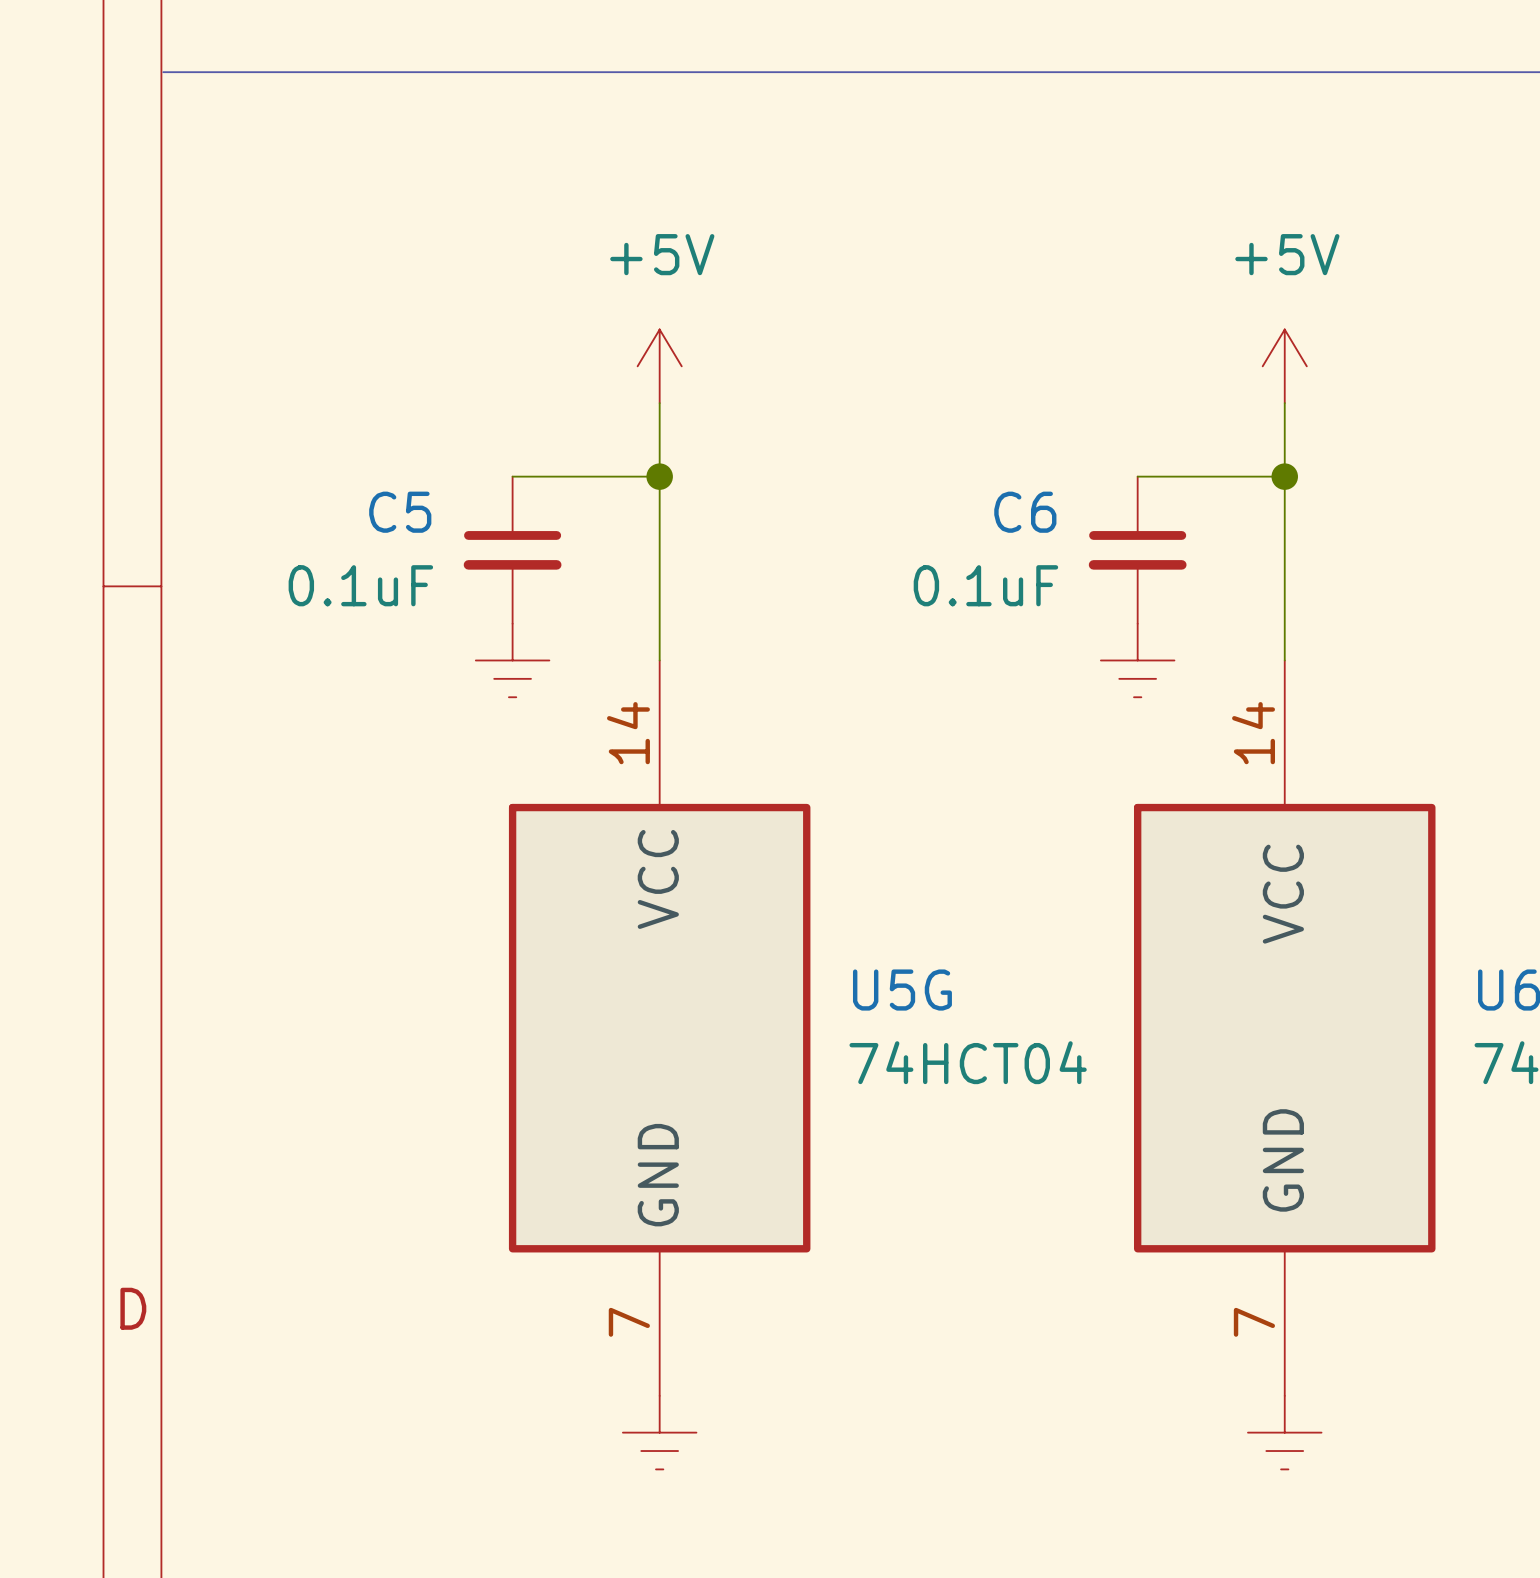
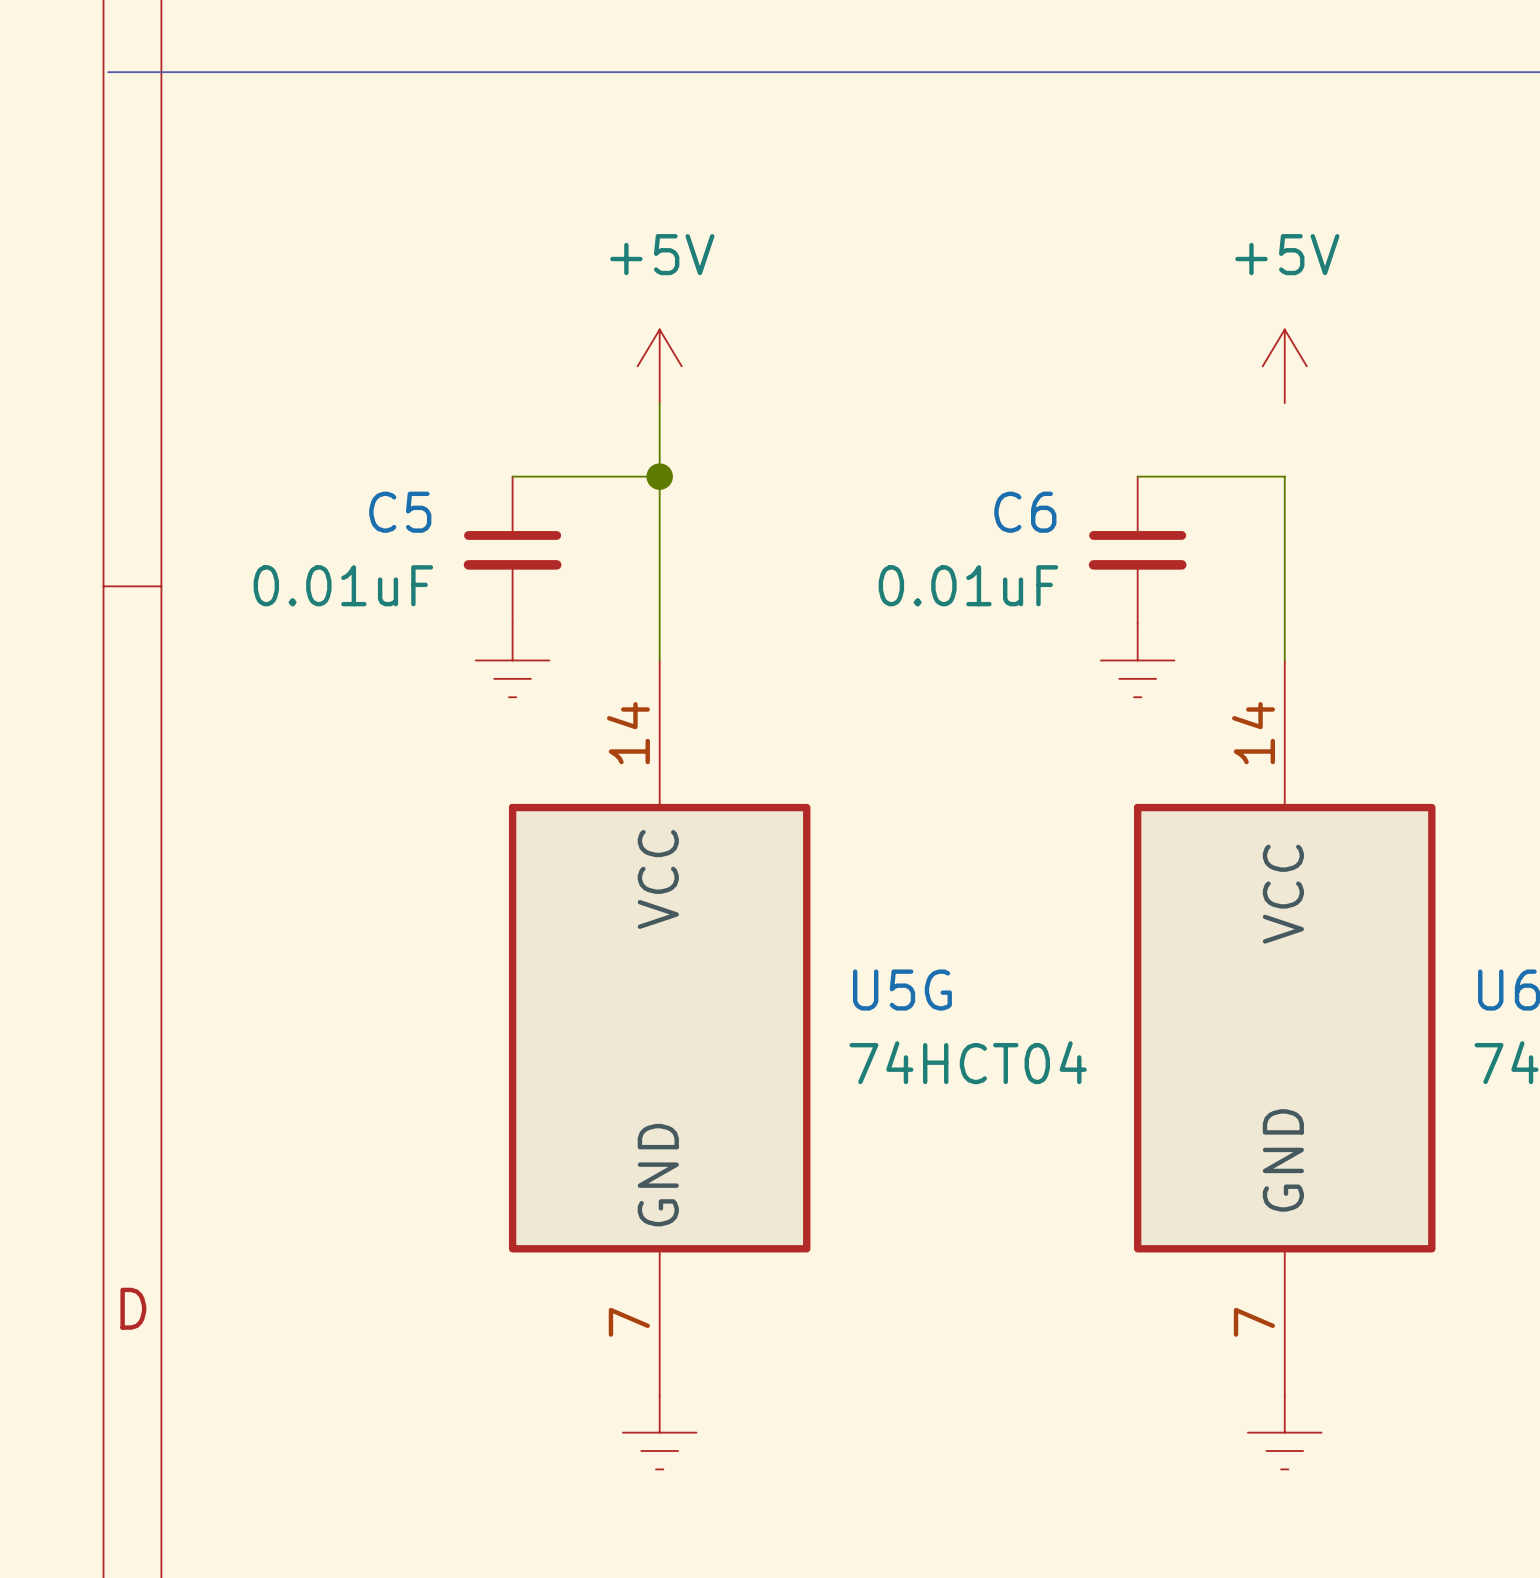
line: none -> (108, 72) (163, 72)
wire: (1284, 403) (1284, 476) -> none
junction: (1284, 476) -> none
C5 value: 0.1uF (360, 585) -> 0.01uF (343, 585)
C6 value: 0.1uF (985, 585) -> 0.01uF (968, 585)

